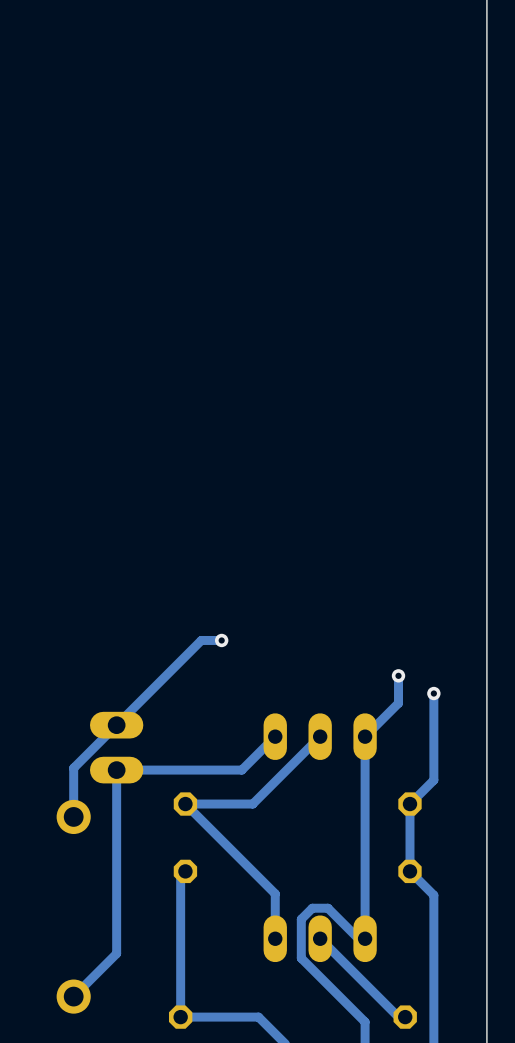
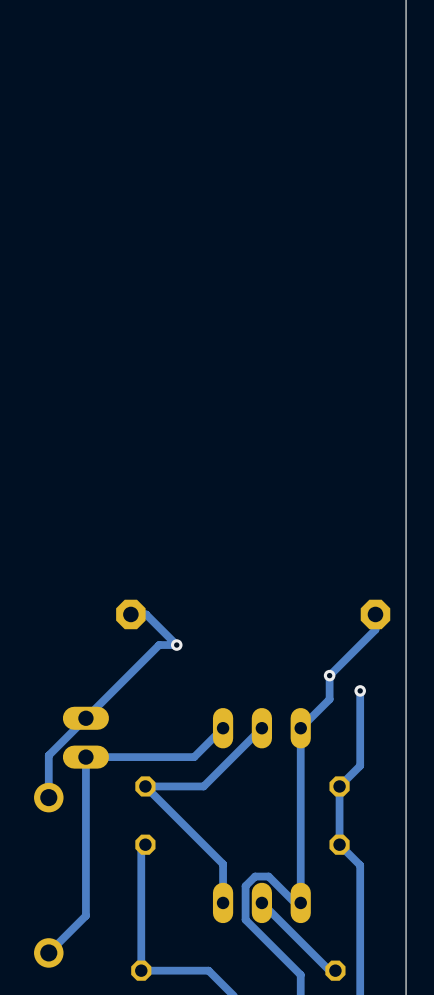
track: none -> (130, 614) (146, 614) (176, 645)
part: none -> (130, 614)
track: none -> (375, 614) (375, 629) (329, 675)
part: none -> (375, 614)

